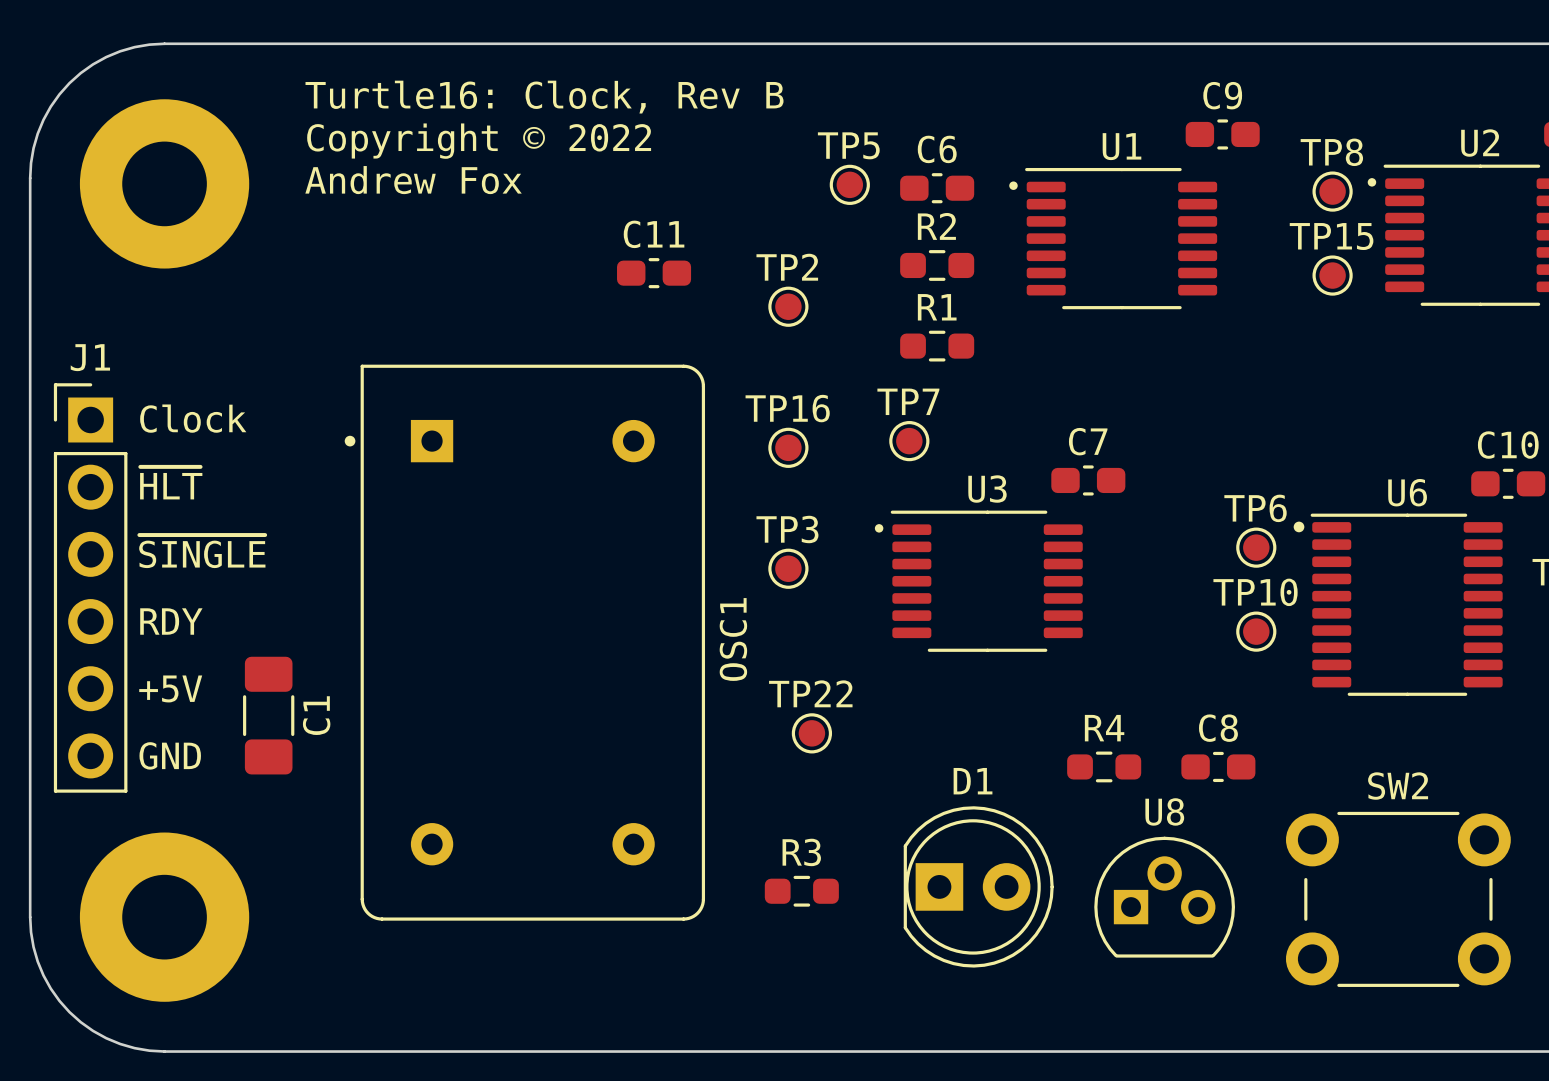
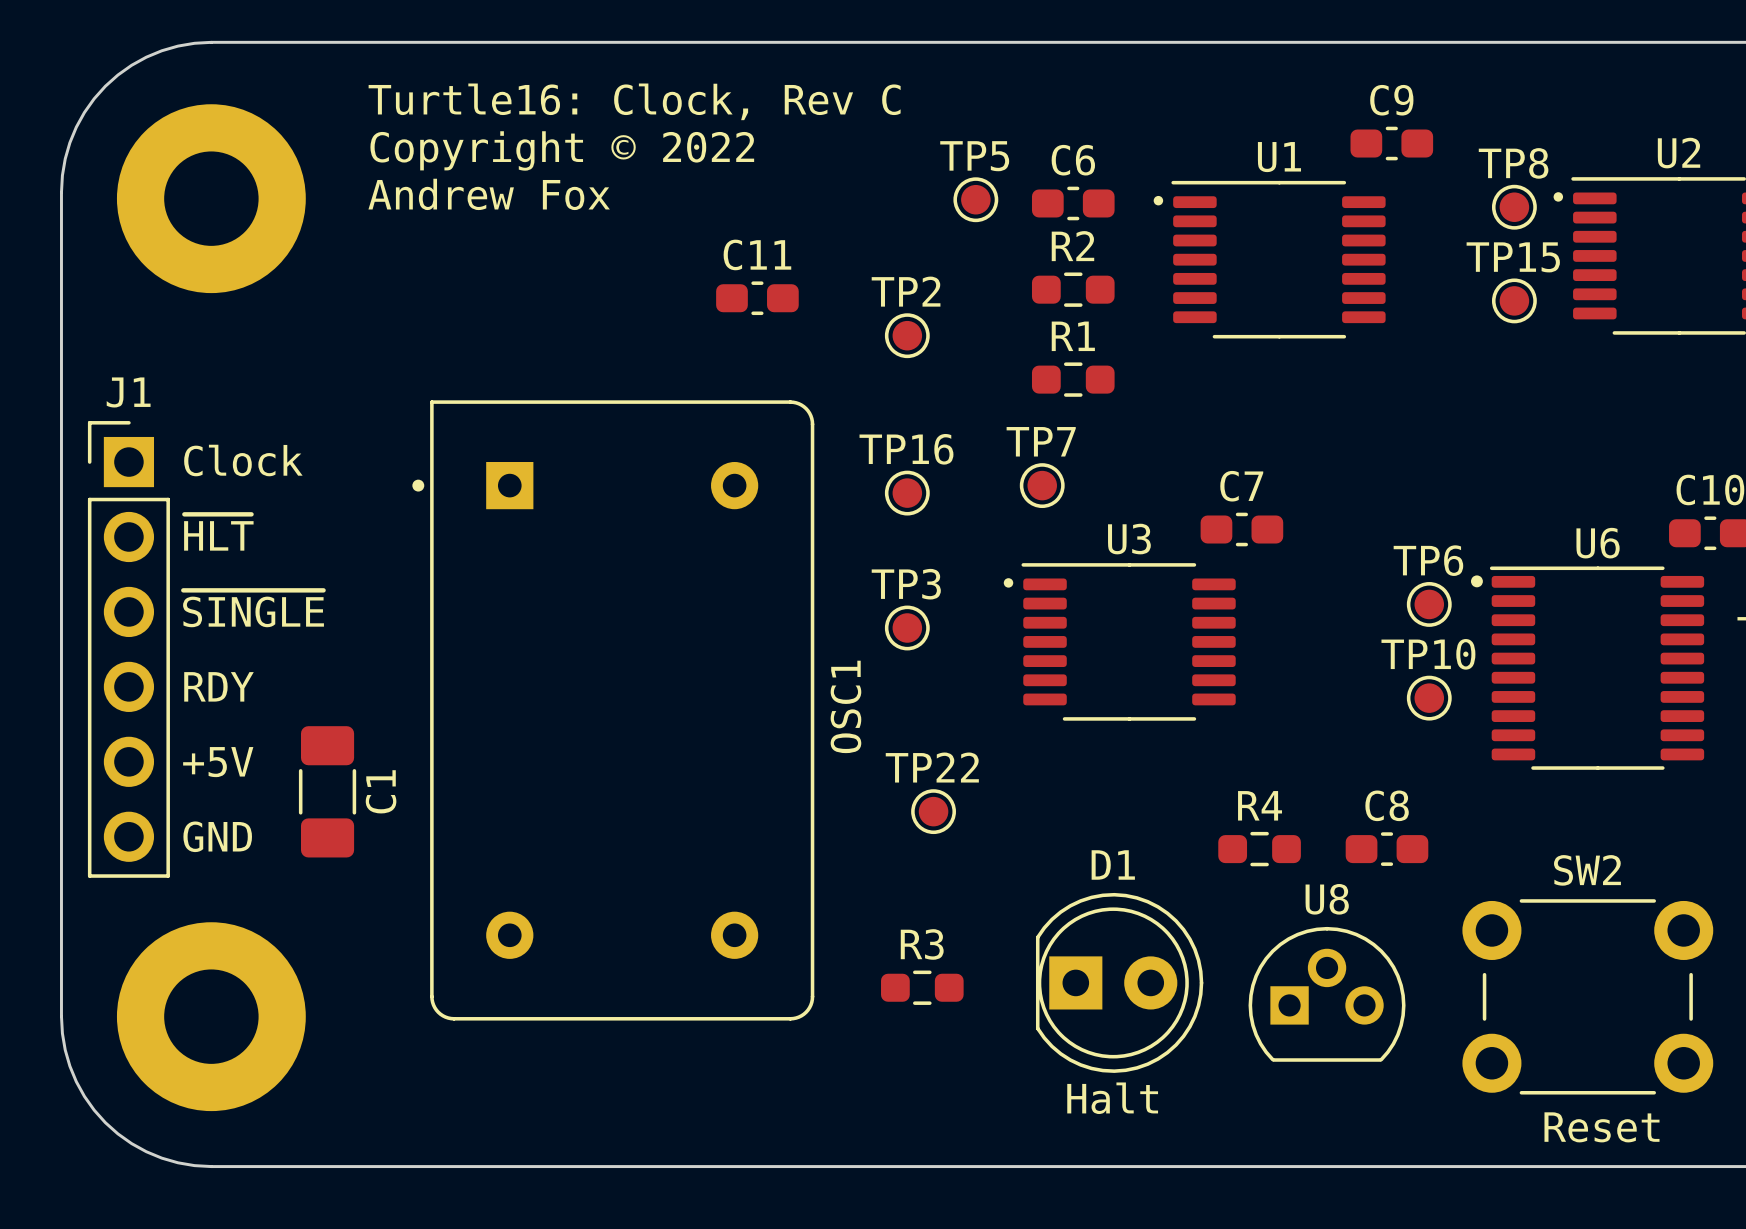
text: Turtle16: Clock, Rev B (544, 97) -> Turtle16: Clock, Rev C (634, 101)
D1 value: none -> Halt (1112, 1098)
SW2 value: none -> Reset (1602, 1127)

